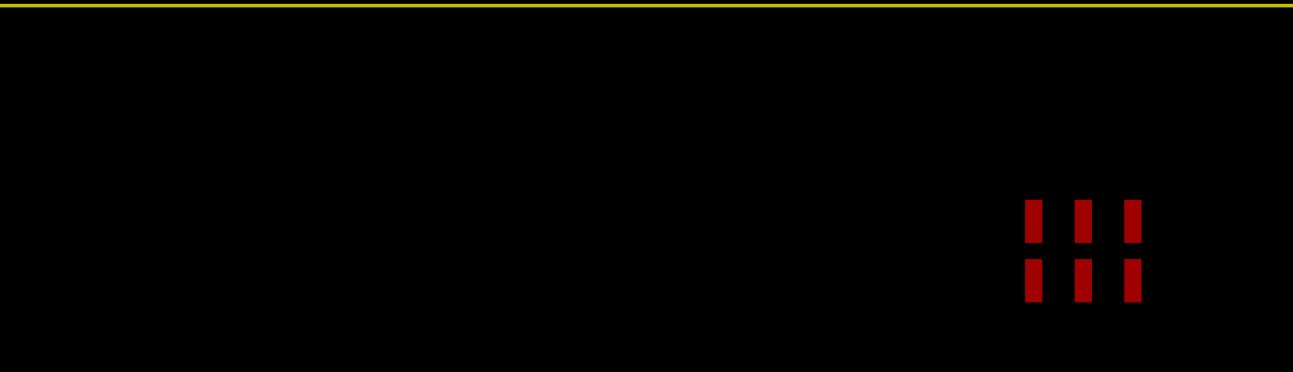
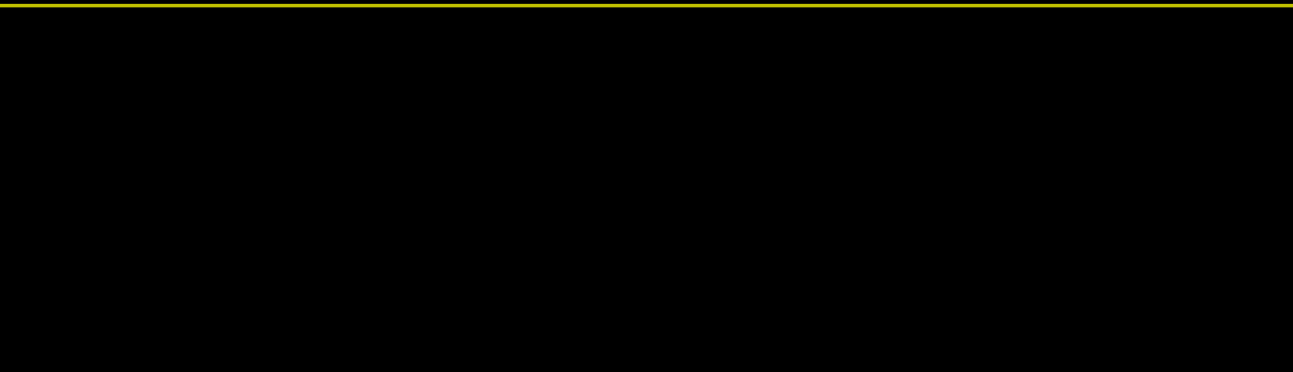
part: (1083, 251) -> none

